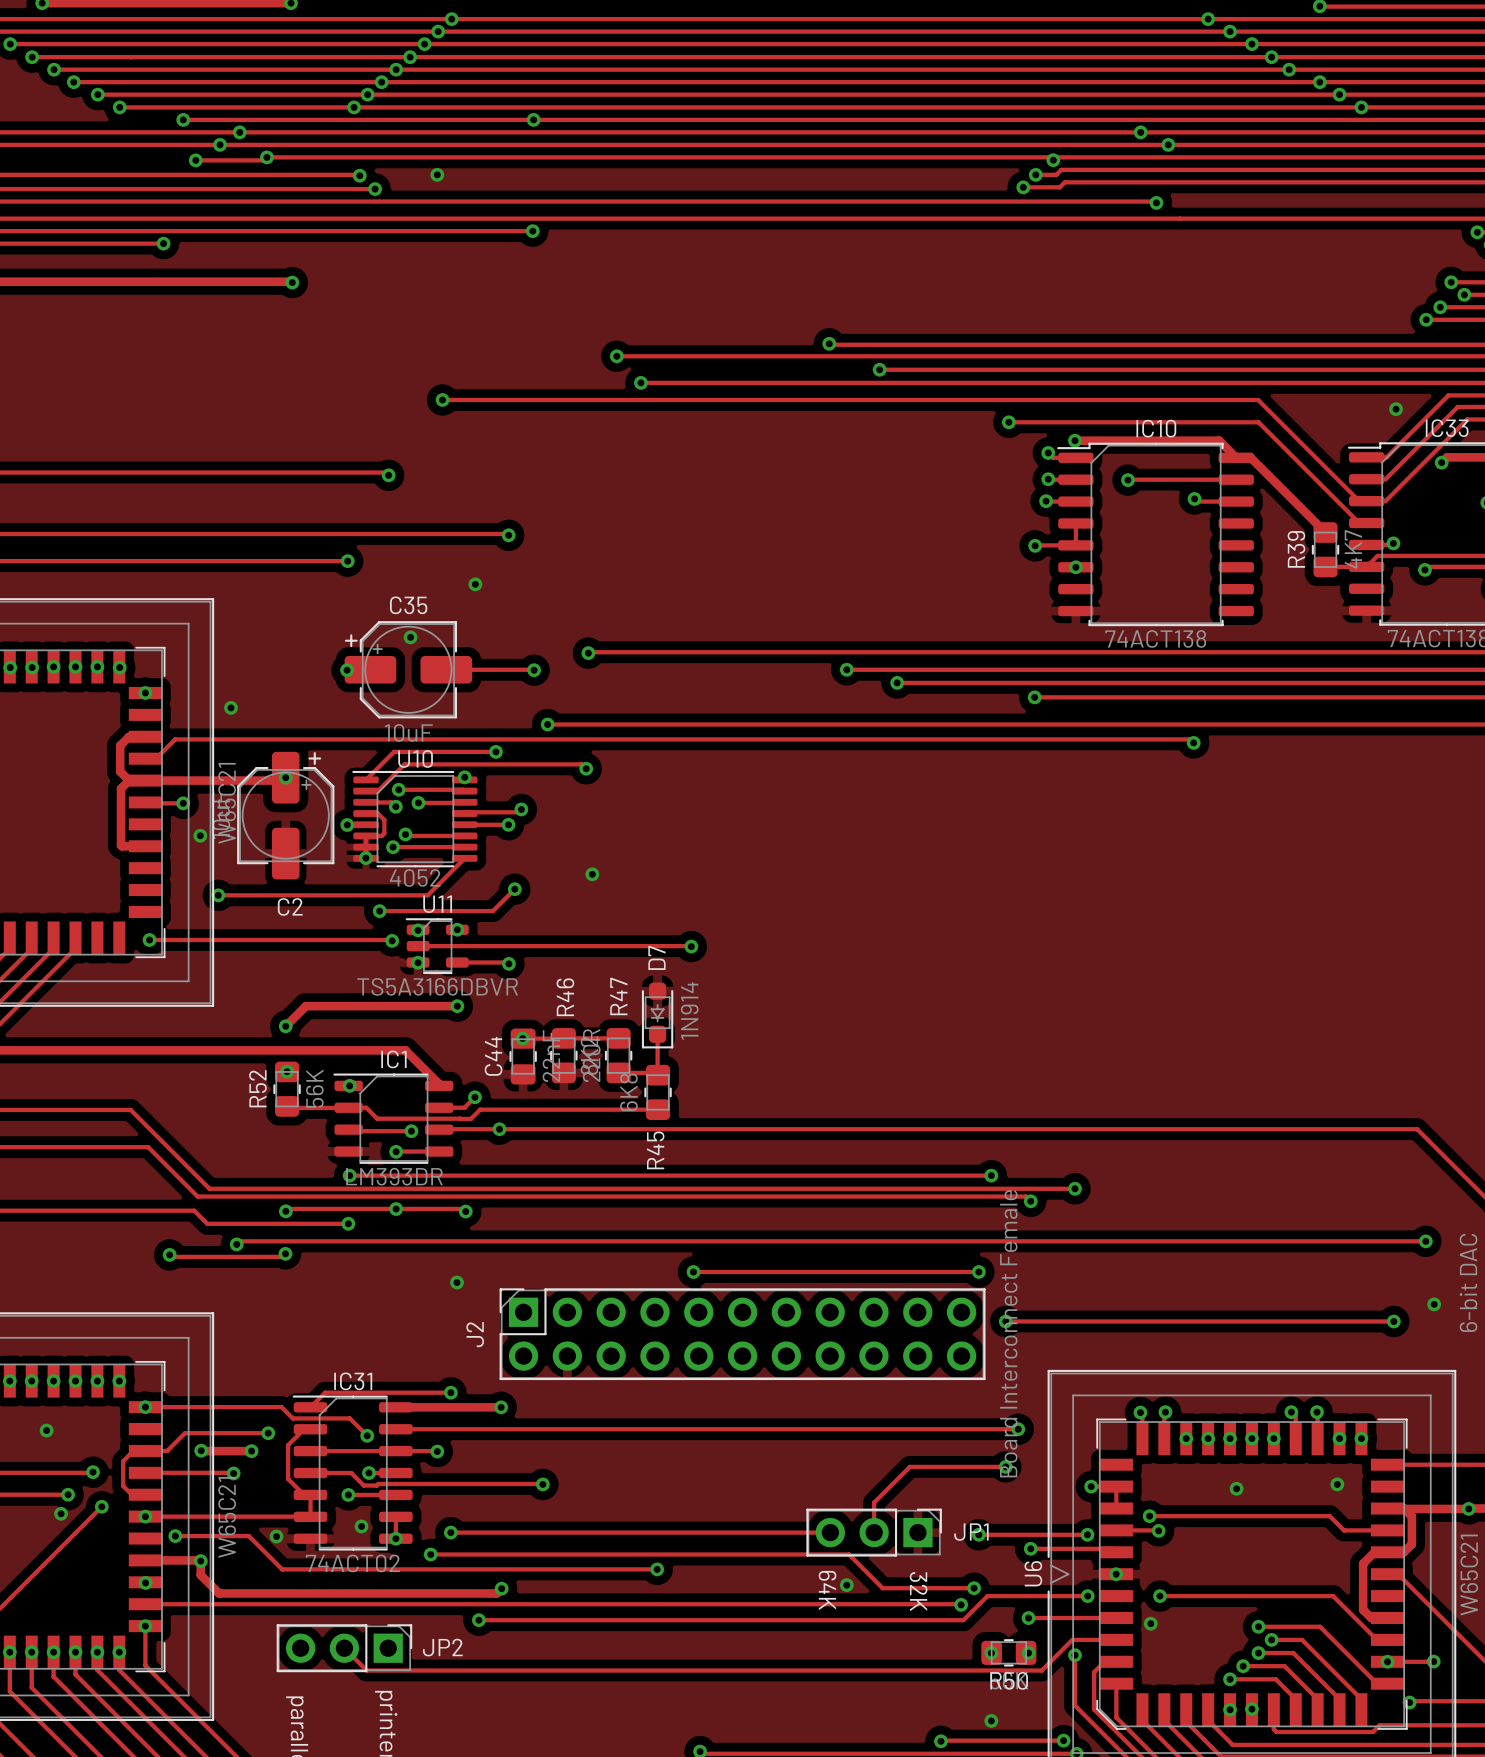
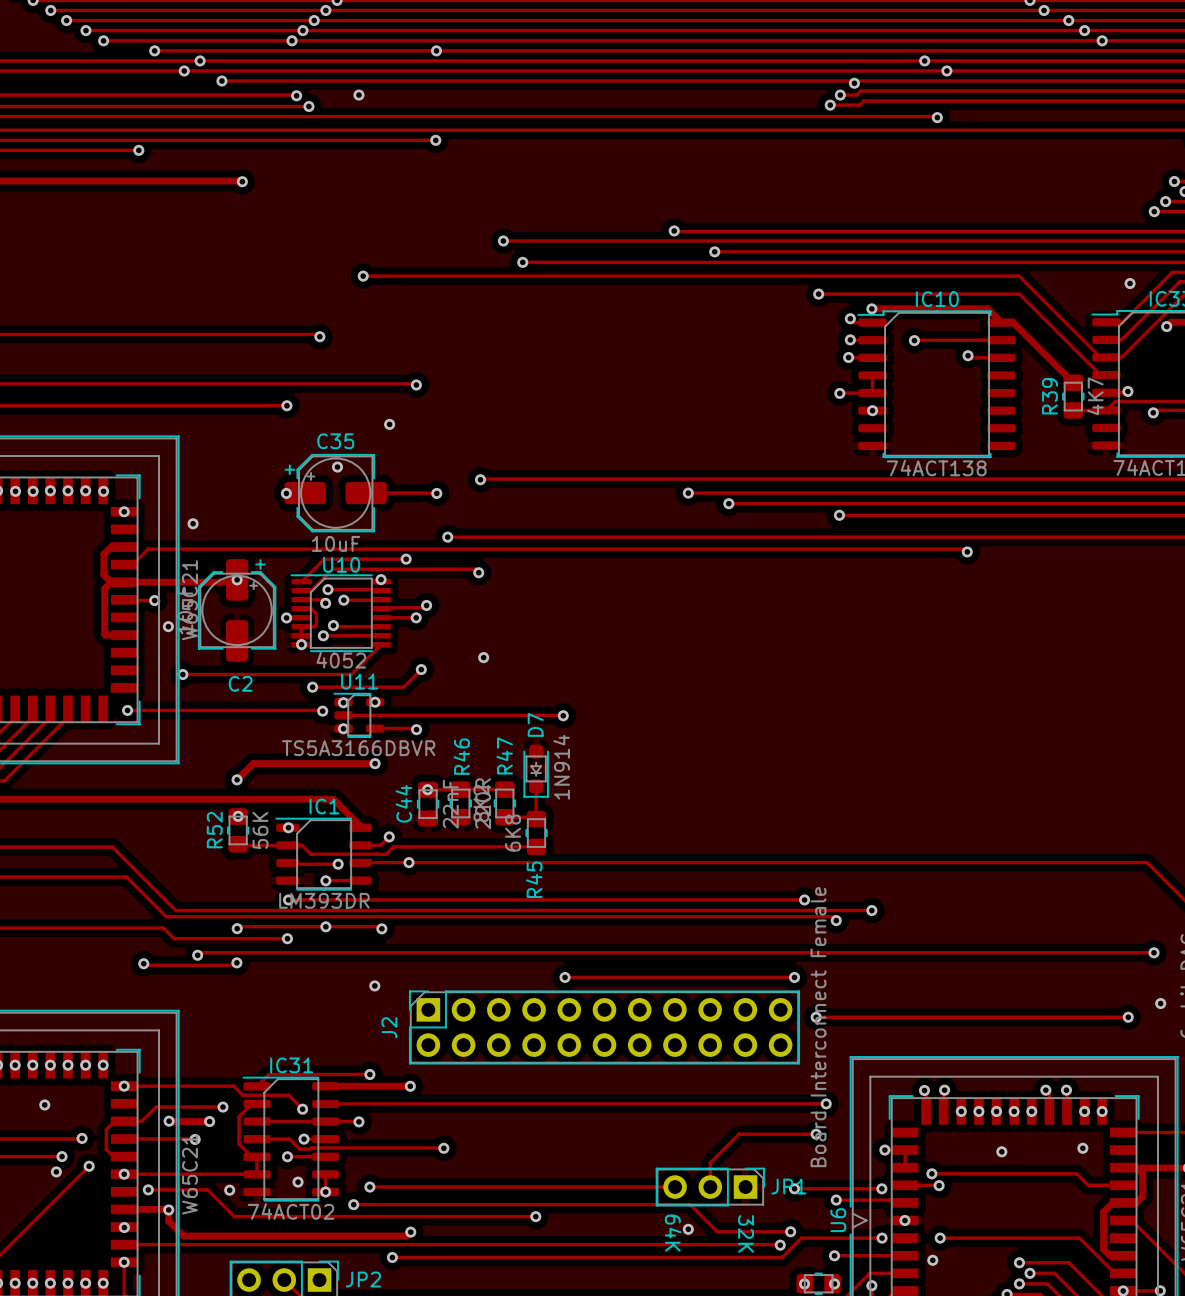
track: (266, 157) (263, 160) (195, 160) -> none
via: (195, 160) -> none

